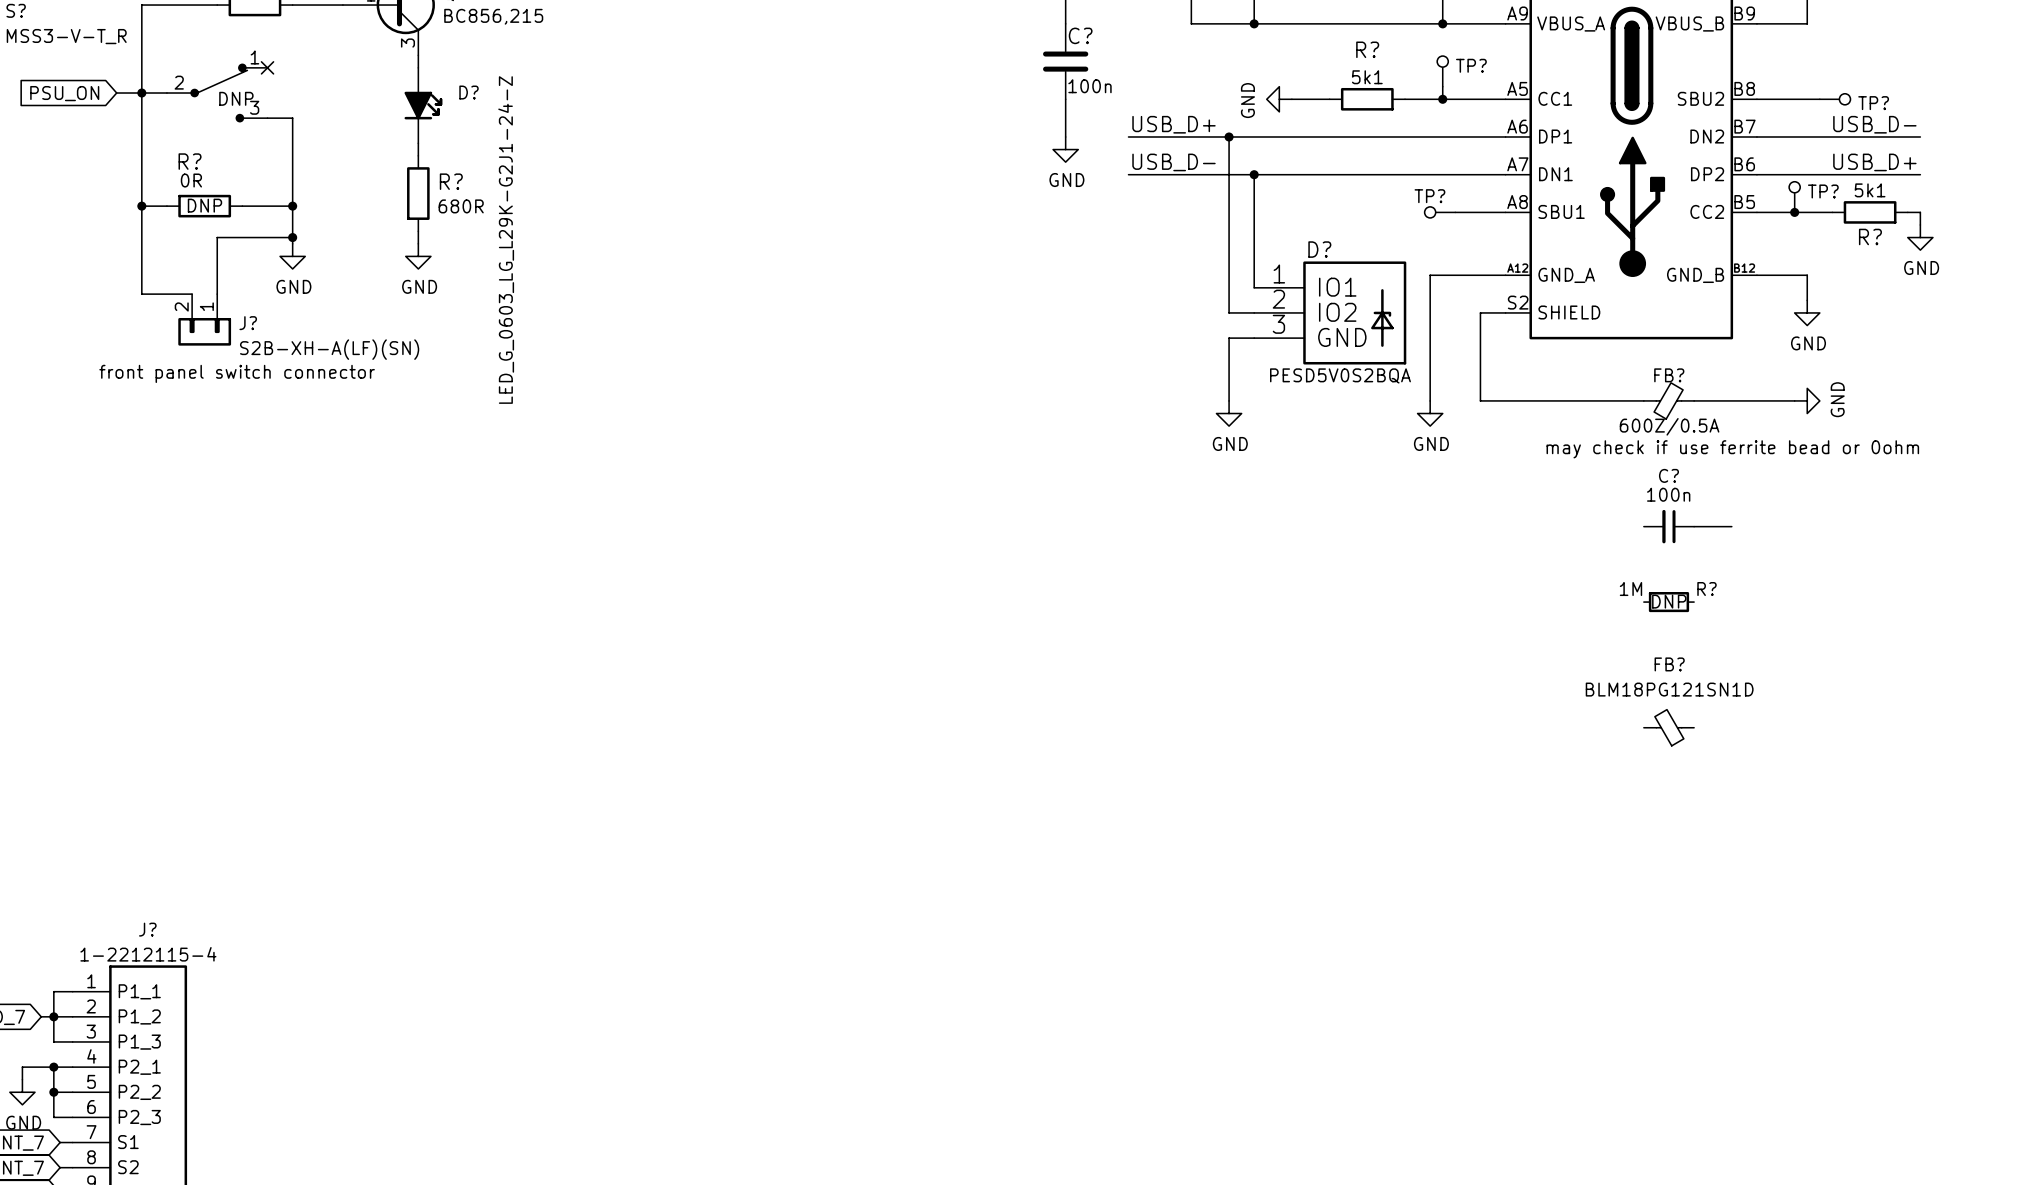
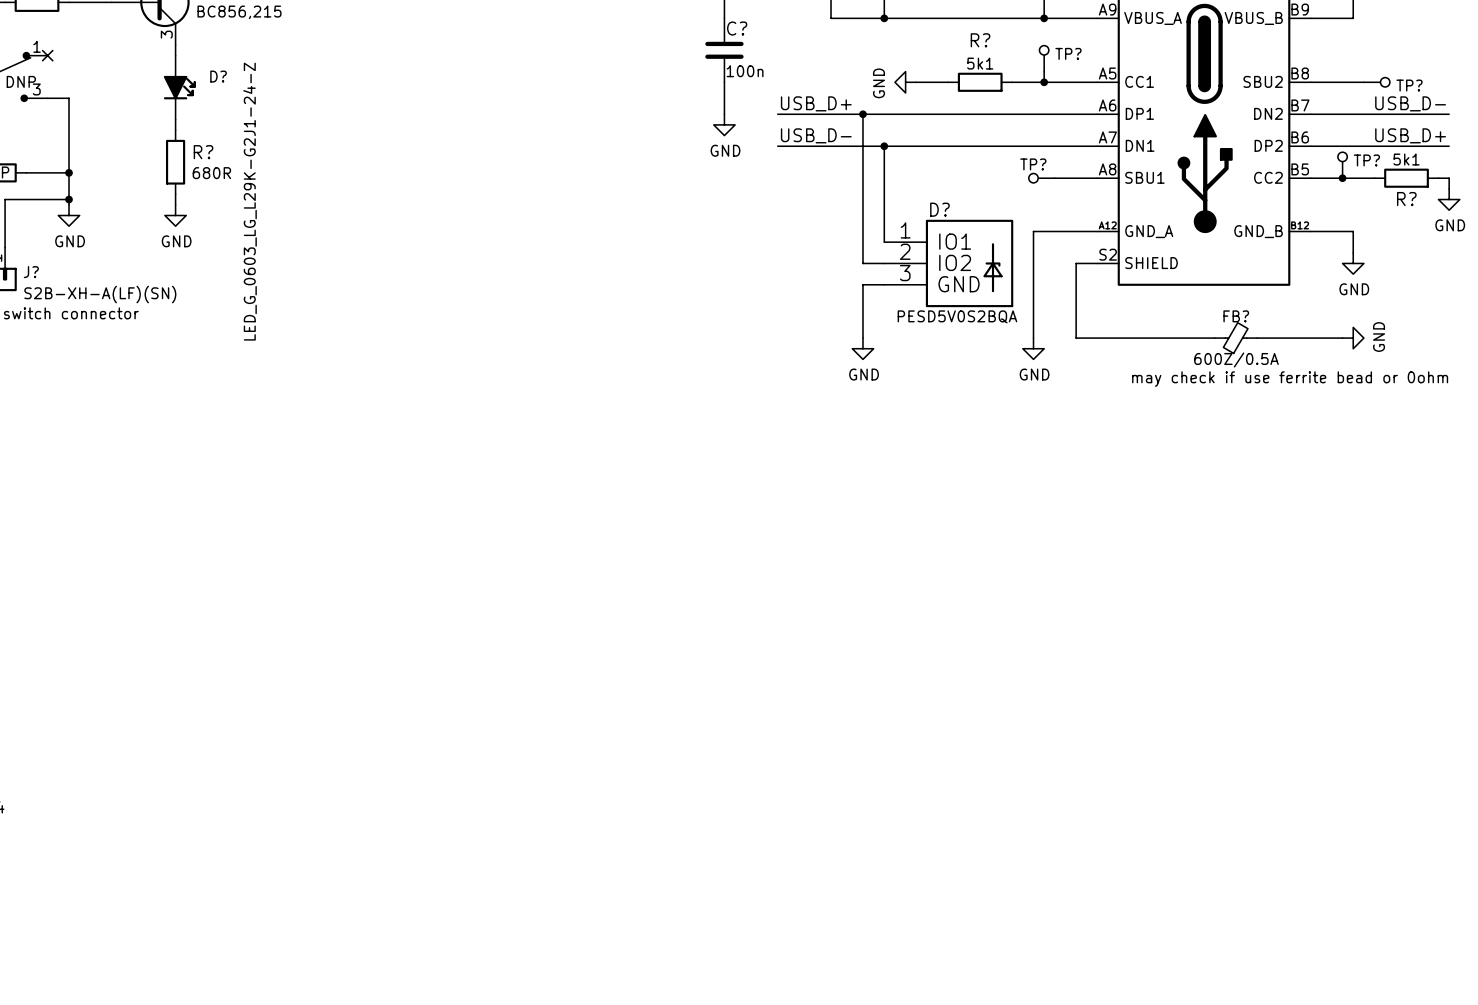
C?: (1668, 526) -> none
wire: (1694, 526) (1731, 526) -> none
R?: (1668, 602) -> none
FB?: (1668, 727) -> none

